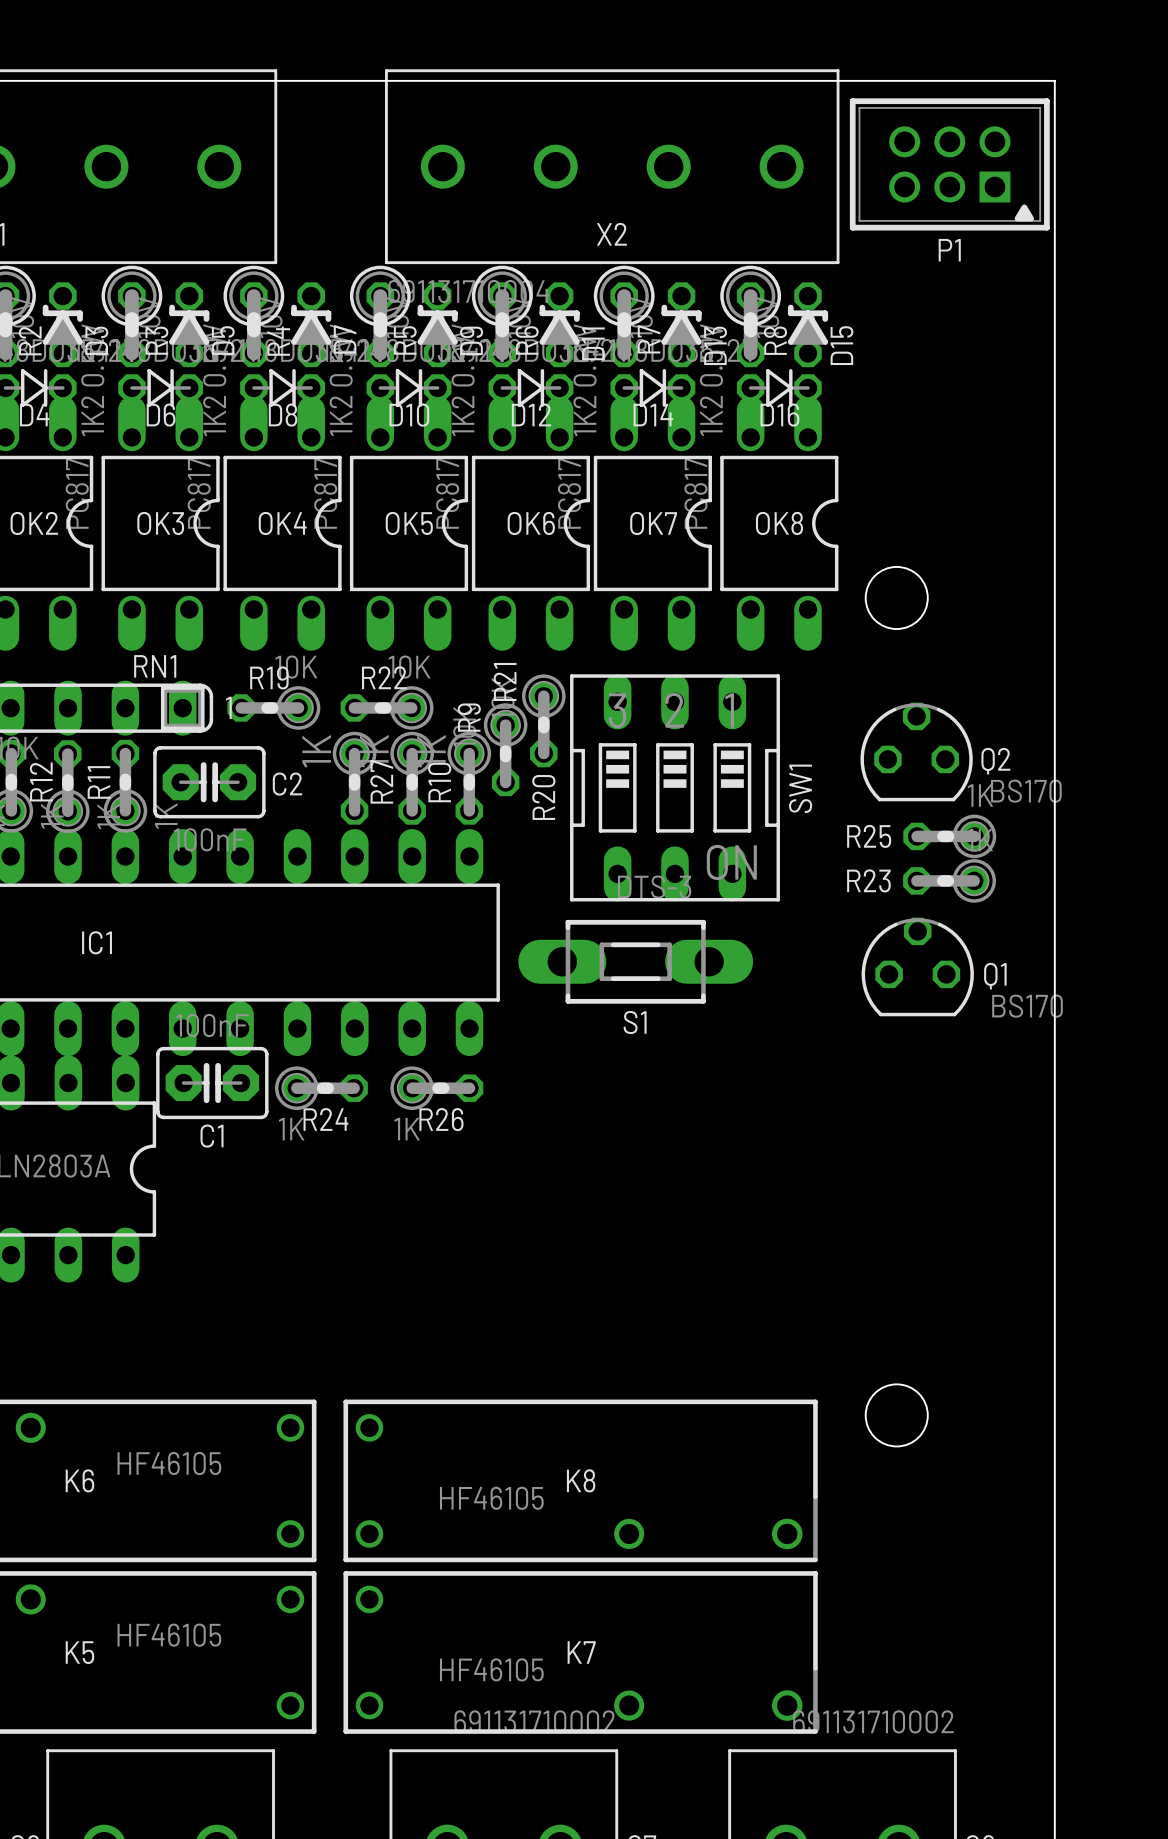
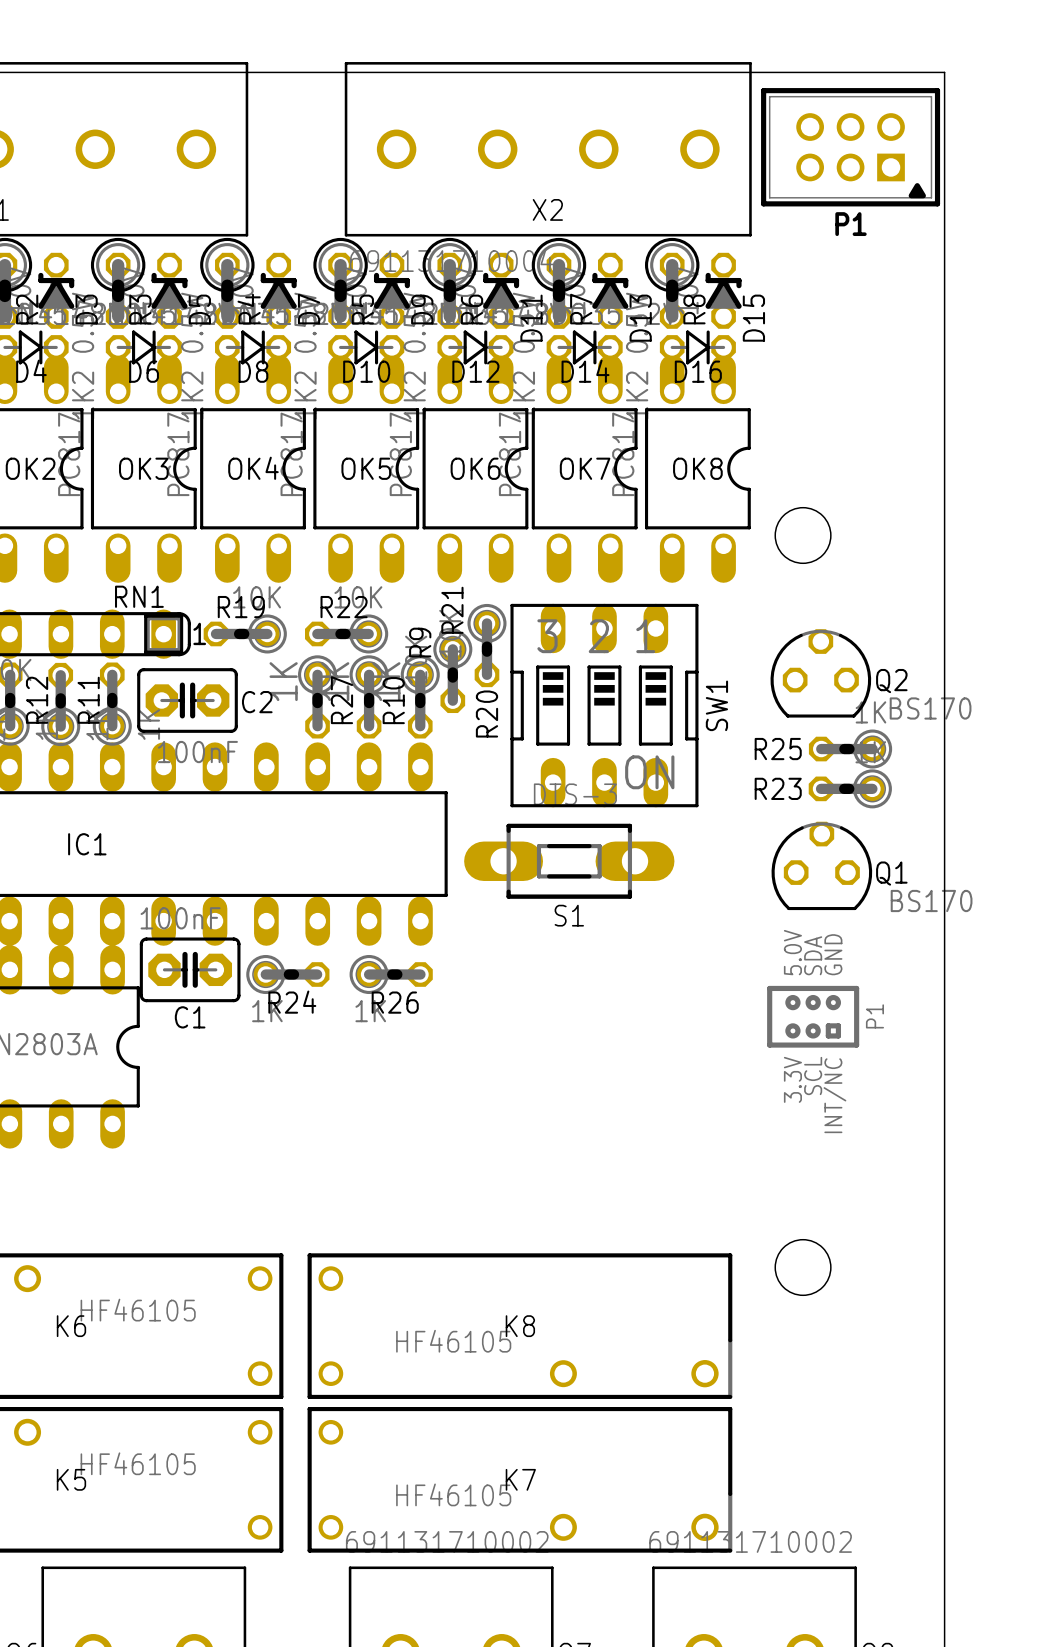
text: none -> 5.0V (792, 952)
text: none -> GND (833, 954)
text: none -> SDA (813, 955)
line: none -> (769, 988) (856, 988) (856, 1045) (769, 1045) (769, 988)
drawing: none -> [785, 994, 842, 1039]
text: none -> P1 (874, 1016)
line: none -> (828, 1025) (838, 1025) (838, 1035) (828, 1035) (828, 1025)
text: none -> SCL (813, 1075)
text: none -> 3.3V (792, 1079)
text: none -> INT/NC (834, 1095)

